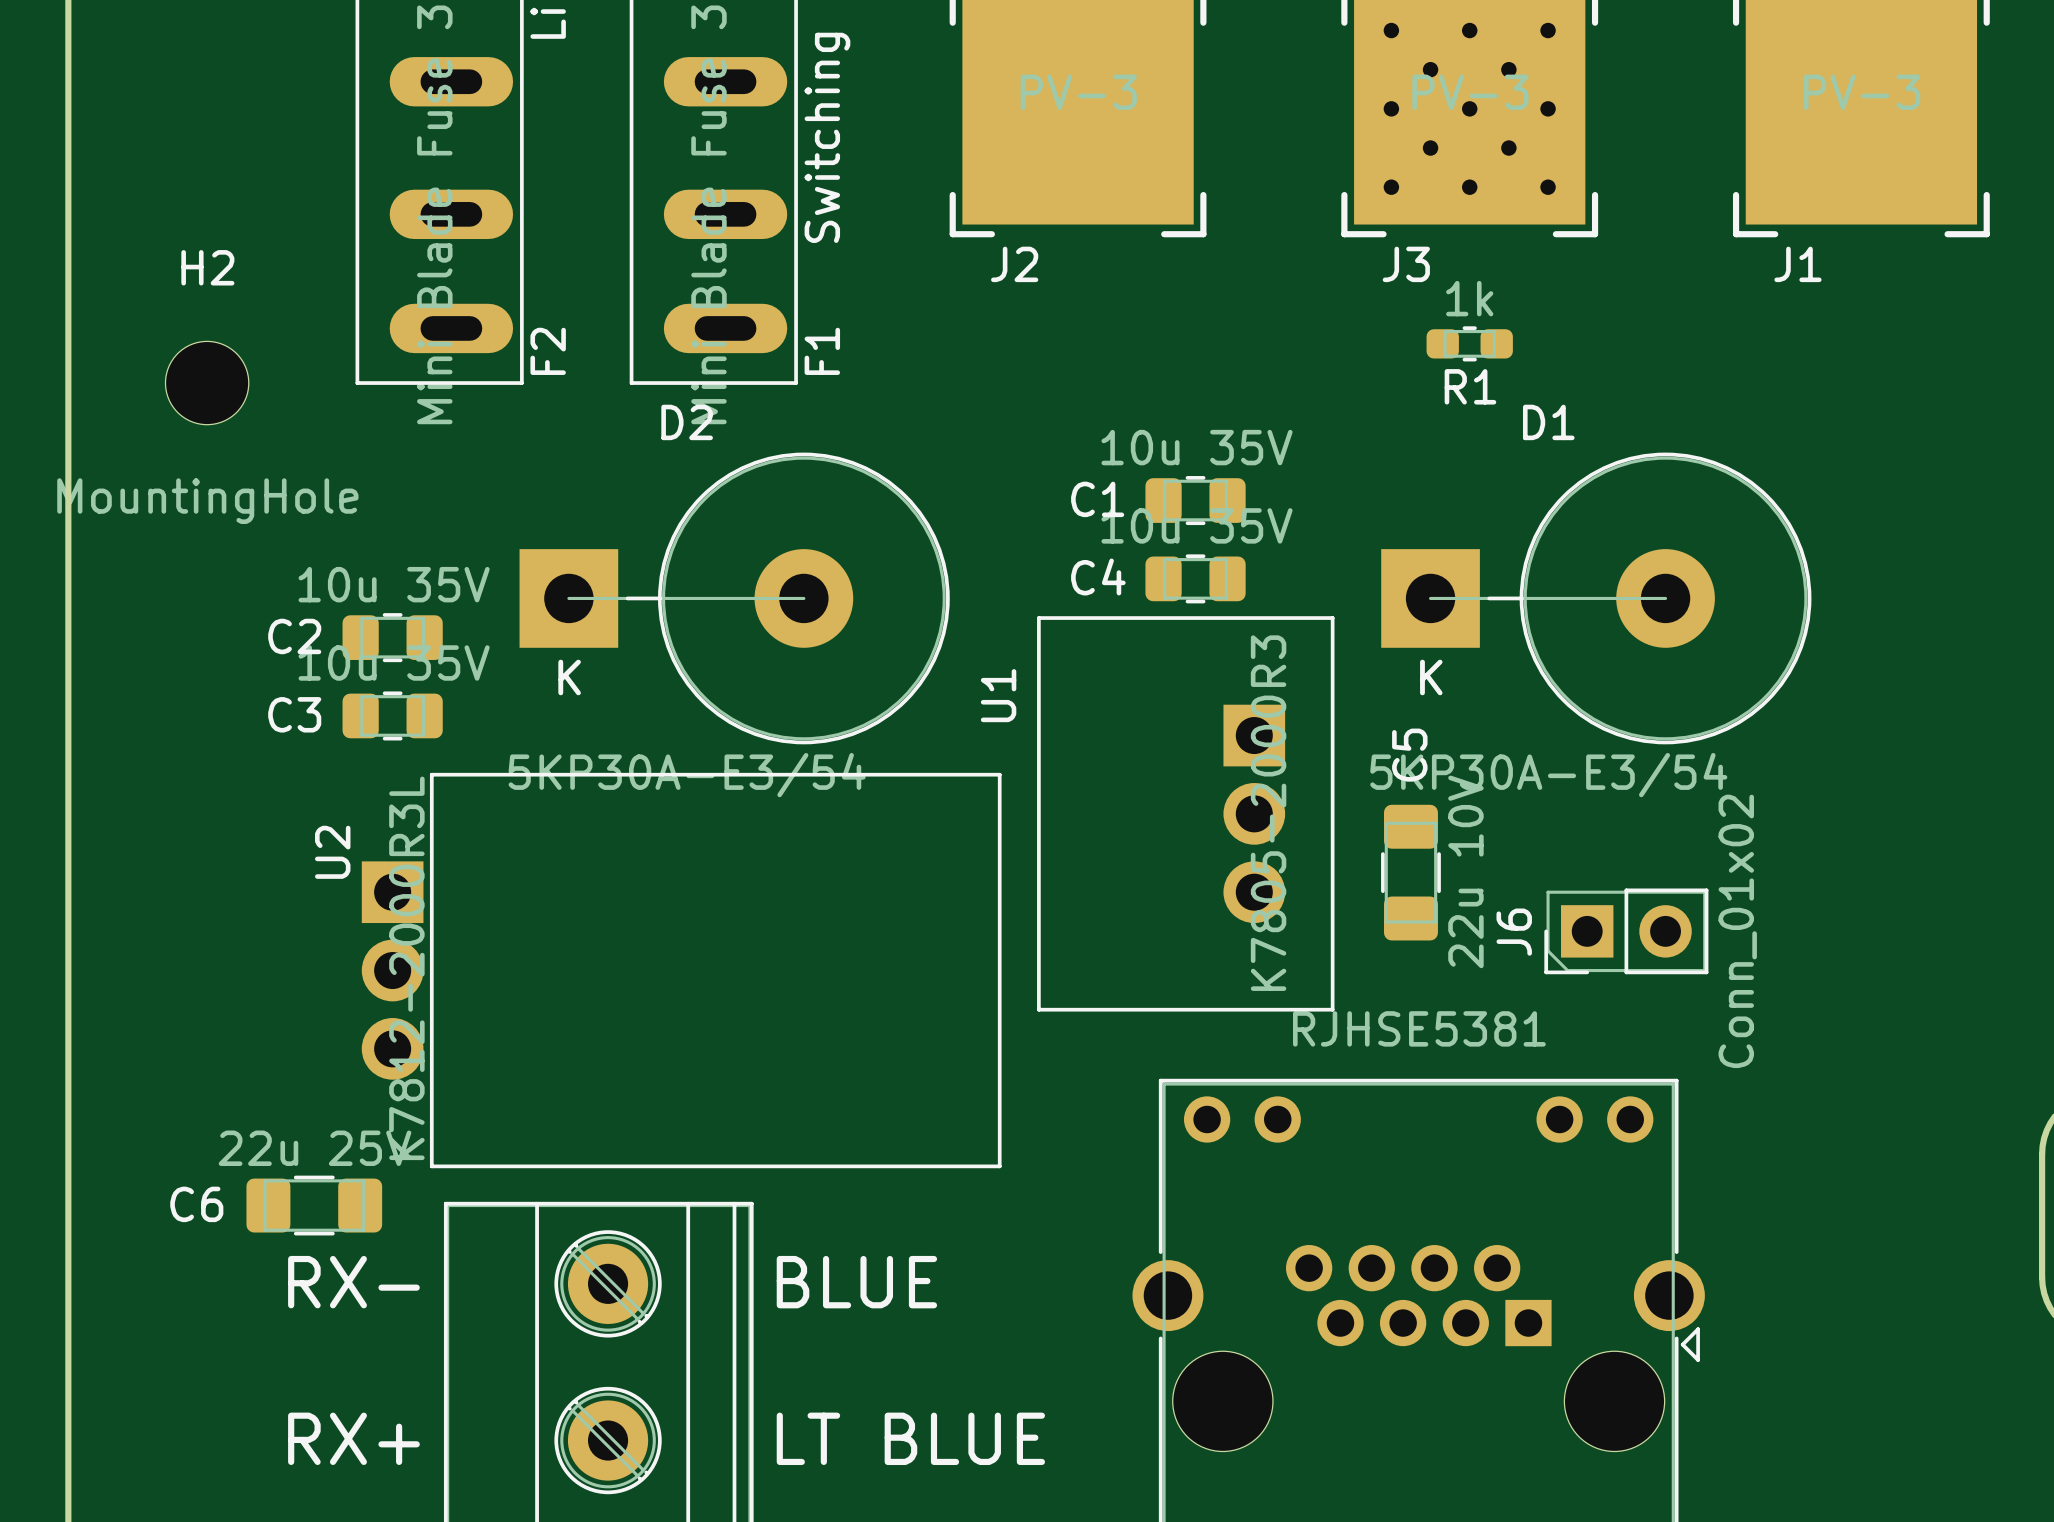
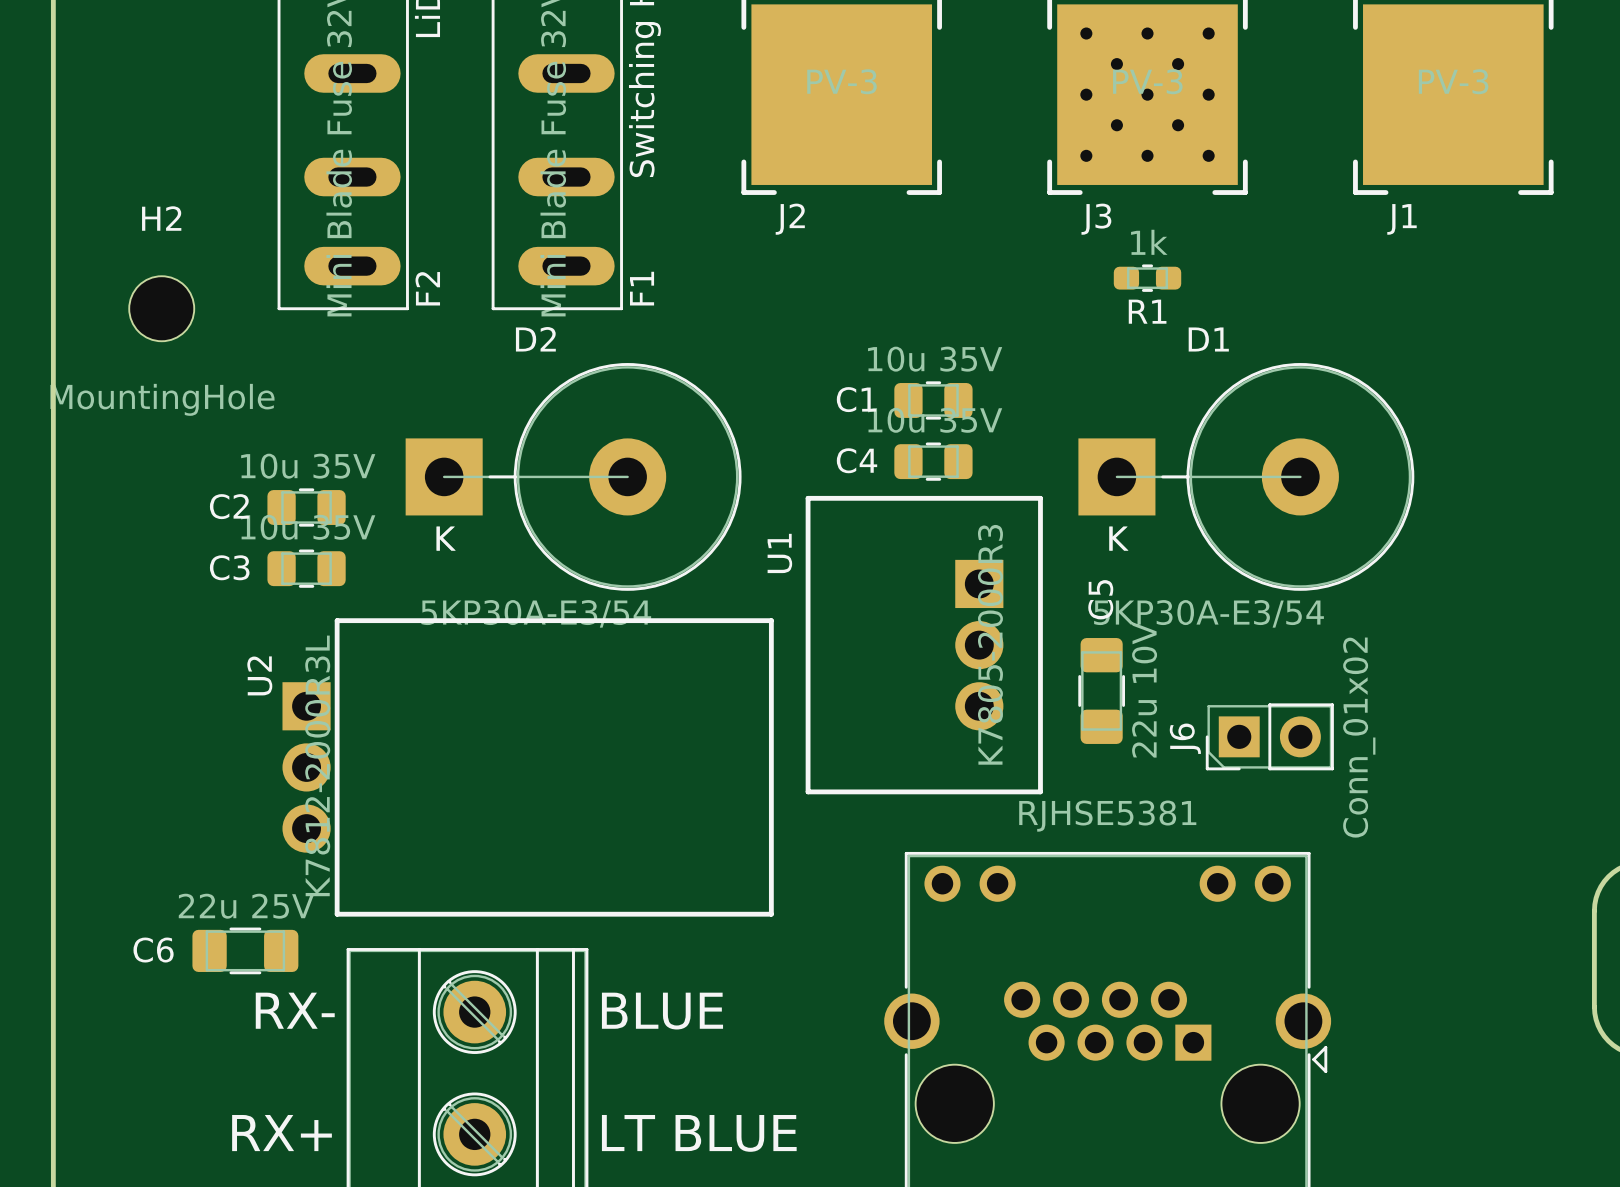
U1 footprint: [1037, 616, 1335, 1012] -> [805, 495, 1043, 795]
U2 footprint: [361, 772, 1002, 1169] -> [282, 618, 774, 917]

